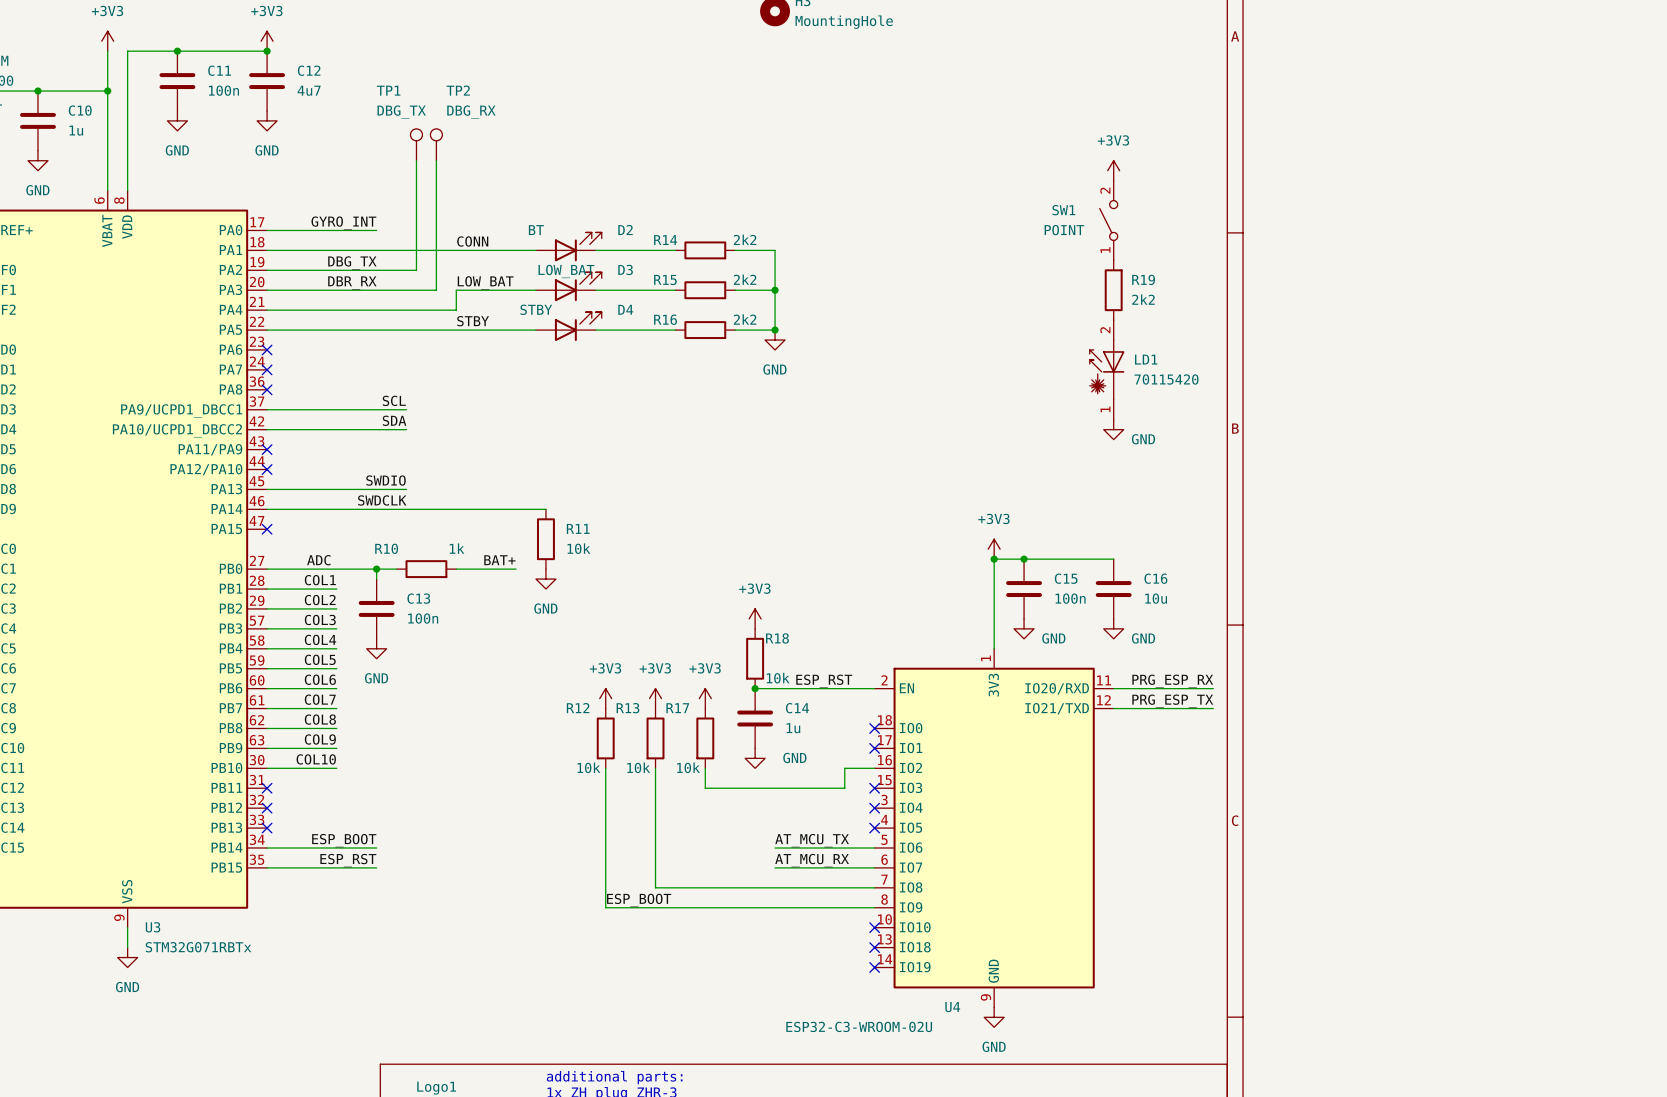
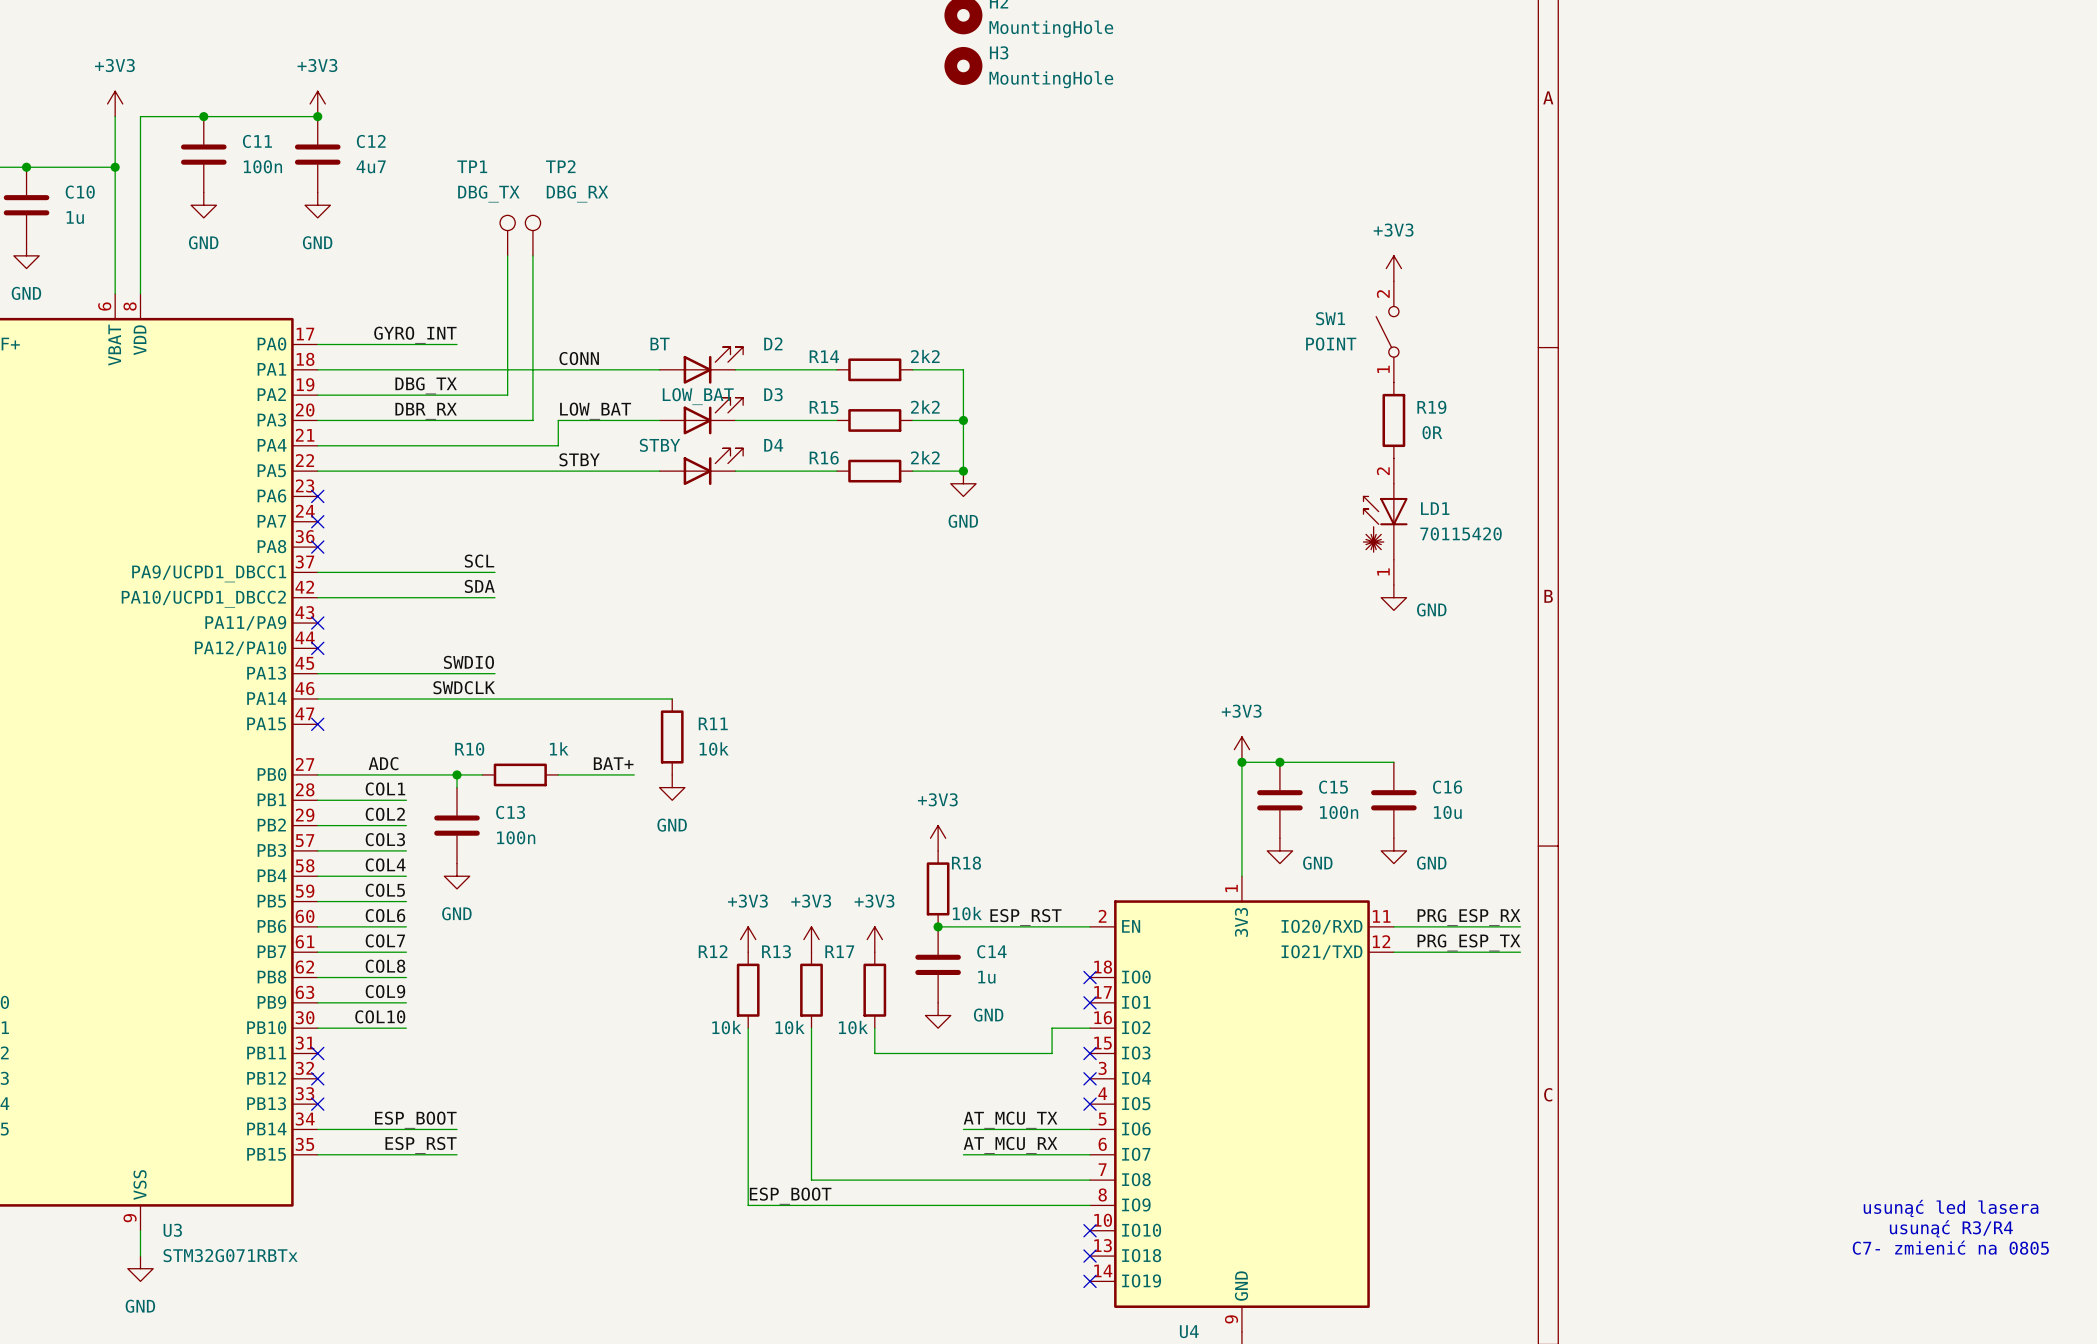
R19 value: 2k2 (1143, 299) -> 0R (1432, 432)
text: none -> usunąć led lasera (1951, 1208)
text: none -> usunąć R3/R4 (1951, 1228)
text: none -> C7- zmienić na 0805 (1950, 1247)

